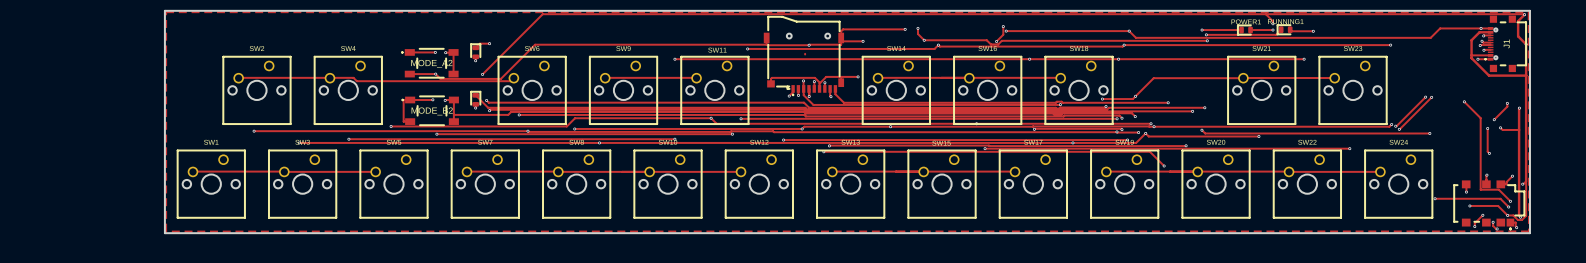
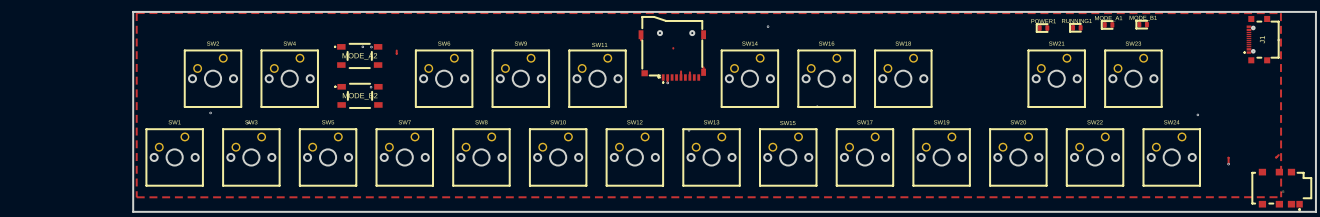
board edge: (164, 10) (164, 233) (1529, 233) (1529, 10) -> (135, 11) (133, 11) (133, 211) (1315, 211) (1315, 11) (1281, 11)
track: (1265, 14) (1272, 23) -> none
via: (1524, 14) -> none
via: (1272, 23) -> none
track: (1003, 26) (1003, 34) (996, 41) -> none
via: (1003, 26) -> none
part: none -> (1107, 24)
part: none -> (1142, 24)
track: (917, 28) (917, 34) (924, 40) (986, 40) (990, 44) (998, 44) (1001, 40) (1207, 40) -> none
via: (1481, 28) -> none
track: (1490, 28) (1440, 28) (1430, 37) (1135, 37) (1129, 31) (1006, 31) -> none
track: (905, 29) (843, 29) (841, 31) (841, 44) (535, 44) (500, 78) (440, 78) (435, 74) (409, 74) -> none
via: (905, 29) -> none
track: (1281, 29) (1276, 34) (1206, 34) -> none
track: (1290, 29) (1313, 31) -> none
track: (1202, 30) (1241, 30) -> none
via: (1202, 30) -> none
track: (1250, 30) (1273, 30) -> none
via: (1273, 30) -> none
via: (1006, 31) -> none
via: (1129, 31) -> none
via: (1313, 31) -> none
track: (1490, 32) (1479, 32) (1471, 40) (1471, 58) (1489, 75) (1526, 75) -> none
via: (1206, 34) -> none
via: (1483, 35) -> none
track: (1490, 35) (1483, 35) -> none
via: (924, 40) -> none
via: (1207, 40) -> none
track: (841, 41) (863, 41) -> none
via: (863, 41) -> none
via: (996, 41) -> none
track: (1482, 41) (1490, 42) -> none
via: (1482, 41) -> none
track: (489, 43) (479, 43) (475, 47) -> none
via: (489, 43) -> none
via: (809, 45) -> none
via: (938, 45) -> none
via: (1124, 45) -> none
track: (1390, 45) (938, 45) (934, 48) (747, 48) -> none
via: (1390, 45) -> none
via: (1480, 45) -> none
track: (1490, 45) (1480, 45) -> none
via: (747, 48) -> none
track: (1490, 49) (1483, 50) -> none
via: (1483, 50) -> none
part: (475, 51) -> none
track: (409, 52) (435, 52) -> none
track: (445, 52) (453, 52) (453, 74) -> none
track: (1471, 55) (1490, 55) -> none
track: (674, 59) (1304, 59) -> none
via: (674, 59) -> none
via: (1029, 59) -> none
via: (1118, 59) -> none
via: (1304, 59) -> none
track: (1477, 59) (1490, 59) -> none
via: (1477, 59) -> none
via: (475, 60) -> none
via: (435, 74) -> none
track: (482, 74) (542, 14) (1524, 14) (1518, 21) (1518, 36) (1526, 44) (1526, 215) (1521, 220) (1517, 220) (1513, 215) (1507, 215) (1498, 205) (1469, 205) -> none
via: (482, 74) -> none
track: (858, 76) (826, 76) (819, 83) (819, 88) -> none
via: (858, 76) -> none
track: (238, 78) (353, 77) (356, 81) (510, 81) (513, 78) -> none
track: (605, 78) (696, 78) -> none
track: (878, 78) (1060, 78) -> none
track: (1334, 78) (1153, 78) (1132, 99) (1102, 99) -> none
track: (803, 80) (803, 95) (813, 104) (1060, 104) -> none
via: (803, 80) -> none
via: (814, 81) -> none
via: (824, 82) -> none
track: (820, 83) (814, 77) (771, 77) (770, 83) -> none
track: (793, 88) (793, 92) (789, 96) -> none
track: (808, 88) (809, 96) -> none
track: (830, 88) (830, 96) -> none
track: (835, 88) (835, 94) (843, 102) (1168, 102) -> none
track: (475, 95) (488, 107) (805, 107) (807, 109) (1055, 110) (1107, 109) (1108, 107) (1204, 107) -> none
via: (789, 96) -> none
via: (809, 96) -> none
via: (830, 96) -> none
via: (1135, 96) -> none
track: (1425, 97) (1395, 126) -> none
via: (1425, 97) -> none
track: (1431, 97) (1399, 129) -> none
via: (1431, 97) -> none
track: (432, 99) (403, 99) (403, 121) (410, 121) -> none
via: (432, 99) -> none
part: (475, 99) -> none
via: (1102, 99) -> none
track: (445, 100) (453, 99) (453, 121) -> none
track: (486, 100) (488, 102) (804, 102) (809, 107) (1059, 108) (1106, 106) -> none
via: (486, 100) -> none
track: (1464, 101) (1480, 118) (1480, 189) (1498, 189) (1510, 201) -> none
via: (1464, 101) -> none
via: (1168, 102) -> none
track: (1507, 103) (1507, 106) (1494, 119) -> none
via: (1507, 103) -> none
via: (1060, 104) -> none
via: (1106, 106) -> none
via: (1204, 107) -> none
via: (475, 108) -> none
track: (1519, 108) (1520, 217) -> none
via: (1519, 108) -> none
track: (489, 110) (1192, 111) -> none
via: (489, 110) -> none
via: (1192, 111) -> none
track: (453, 114) (508, 114) (511, 111) (804, 111) (805, 113) (1132, 113) (1135, 116) -> none
track: (519, 114) (1119, 115) (1122, 118) -> none
via: (519, 114) -> none
via: (1135, 116) -> none
via: (711, 118) -> none
track: (741, 118) (1117, 118) -> none
via: (741, 118) -> none
via: (1117, 118) -> none
via: (1122, 118) -> none
via: (1494, 119) -> none
track: (1151, 123) (716, 123) (711, 118) (575, 118) (566, 126) (391, 126) -> none
via: (1151, 123) -> none
track: (1391, 124) (1389, 126) (804, 126) (802, 128) (574, 128) -> none
via: (1391, 124) -> none
via: (391, 126) -> none
via: (890, 126) -> none
via: (1154, 126) -> none
via: (1395, 126) -> none
track: (1500, 127) (1502, 129) (1519, 129) -> none
via: (1500, 127) -> none
via: (574, 128) -> none
via: (802, 128) -> none
track: (1487, 128) (1487, 151) (1489, 153) -> none
via: (1487, 128) -> none
track: (1034, 129) (1122, 129) -> none
via: (1034, 129) -> none
via: (1122, 129) -> none
via: (1399, 129) -> none
track: (1201, 130) (1205, 133) (1429, 133) -> none
via: (1201, 130) -> none
track: (254, 131) (1138, 132) -> none
via: (527, 131) -> none
via: (1116, 131) -> none
via: (1138, 132) -> none
via: (1145, 133) -> none
track: (436, 134) (732, 134) -> none
via: (436, 134) -> none
via: (732, 134) -> none
track: (1258, 136) (1148, 136) (1145, 133) (1136, 142) (299, 142) -> none
via: (1258, 136) -> none
track: (348, 139) (674, 139) -> none
via: (348, 139) -> none
via: (674, 139) -> none
track: (783, 140) (1127, 140) -> none
via: (783, 140) -> none
via: (1127, 140) -> none
via: (599, 142) -> none
via: (1072, 142) -> none
via: (829, 145) -> none
track: (1186, 145) (829, 145) -> none
via: (1186, 145) -> none
track: (985, 148) (1349, 148) -> none
via: (985, 148) -> none
via: (1349, 148) -> none
track: (823, 151) (1149, 151) (1164, 166) -> none
via: (1489, 153) -> none
via: (1164, 166) -> none
track: (192, 171) (284, 171) -> none
track: (284, 171) (375, 171) -> none
track: (467, 171) (558, 171) -> none
track: (558, 171) (740, 171) -> none
track: (832, 171) (1015, 171) -> none
track: (1106, 171) (1289, 171) -> none
track: (1289, 171) (1380, 171) -> none
track: (1486, 175) (1486, 184) (1486, 180) -> none
via: (1486, 175) -> none
track: (1512, 176) (1506, 184) (1500, 184) -> none
via: (1512, 176) -> none
via: (1522, 184) -> none
track: (1435, 198) (1500, 198) (1508, 207) -> none
via: (1435, 198) -> none
via: (1510, 201) -> none
via: (1469, 205) -> none
part: (1489, 205) -> none
via: (1508, 207) -> none
track: (1482, 215) (1474, 223) (1474, 226) -> none
via: (1482, 215) -> none
via: (1507, 215) -> none
via: (1520, 217) -> none
track: (1493, 222) (1493, 225) (1497, 228) -> none
via: (1493, 222) -> none
track: (1510, 222) (1515, 222) (1516, 227) -> none
part: none -> (1281, 189)
via: (1474, 226) -> none
via: (1516, 227) -> none
via: (1497, 228) -> none

